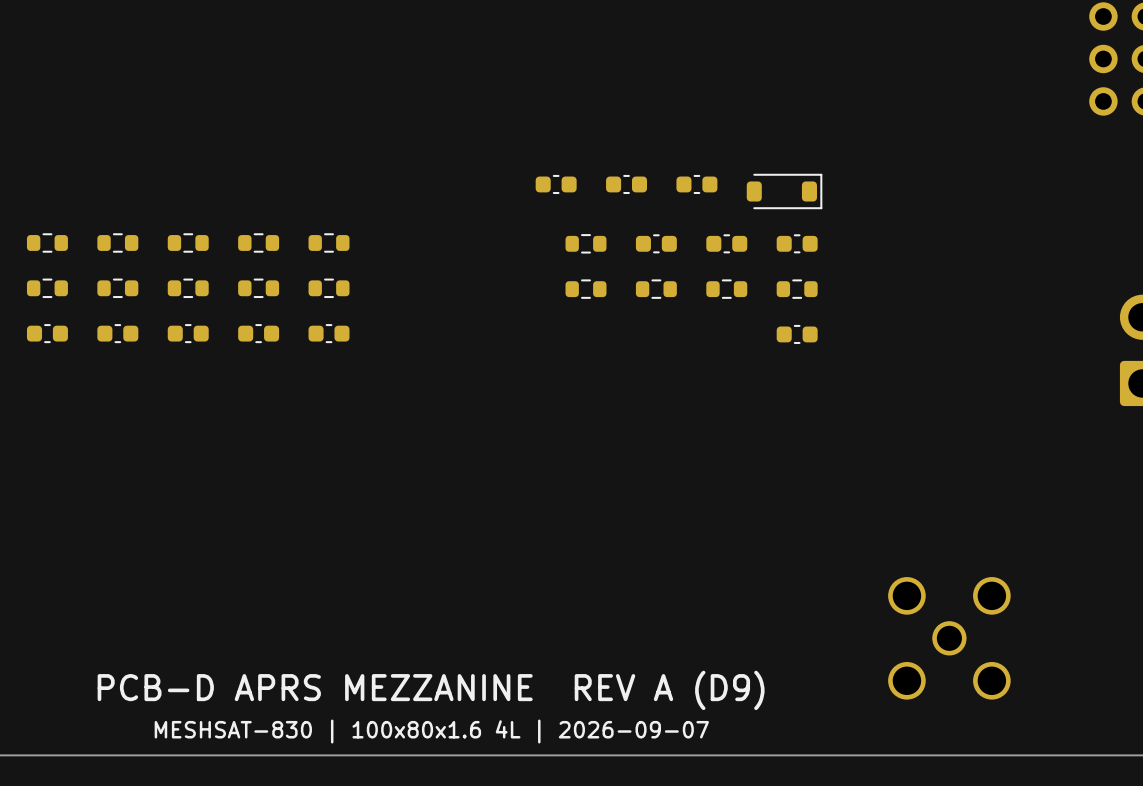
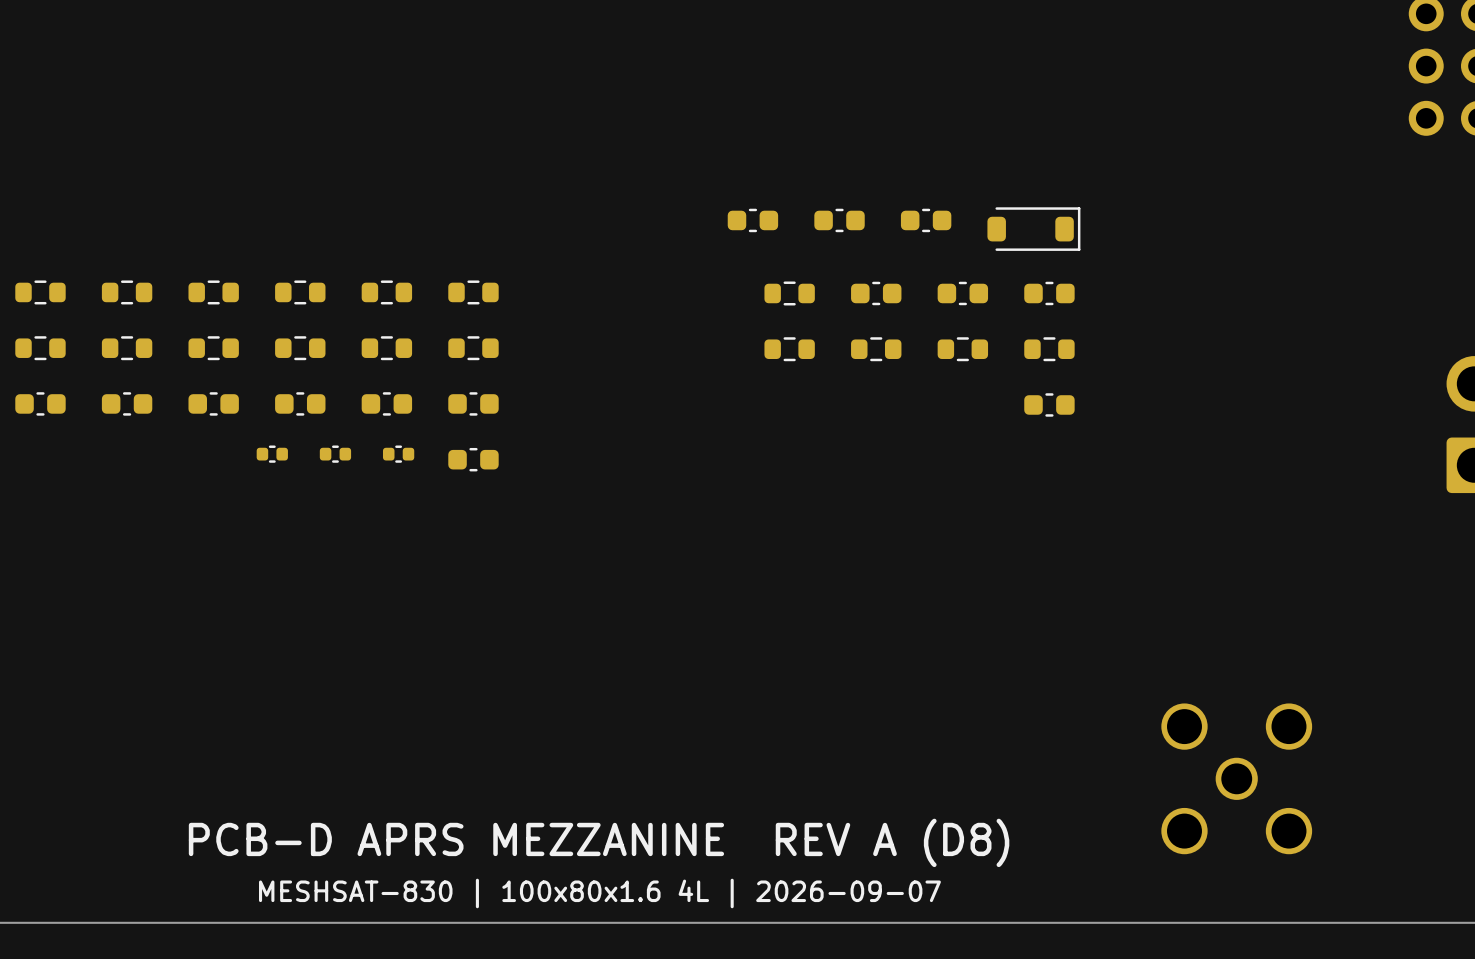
part: none -> (272, 454)
part: none -> (335, 454)
part: none -> (398, 454)
part: none -> (473, 459)
text: PCB-D APRS MEZZANINE REV A (D9) (431, 690) -> PCB-D APRS MEZZANINE REV A (D8) (599, 842)

